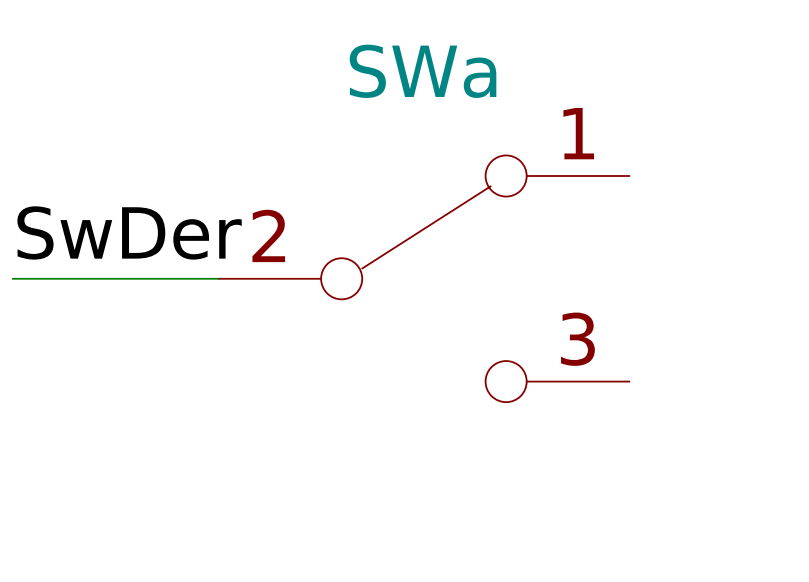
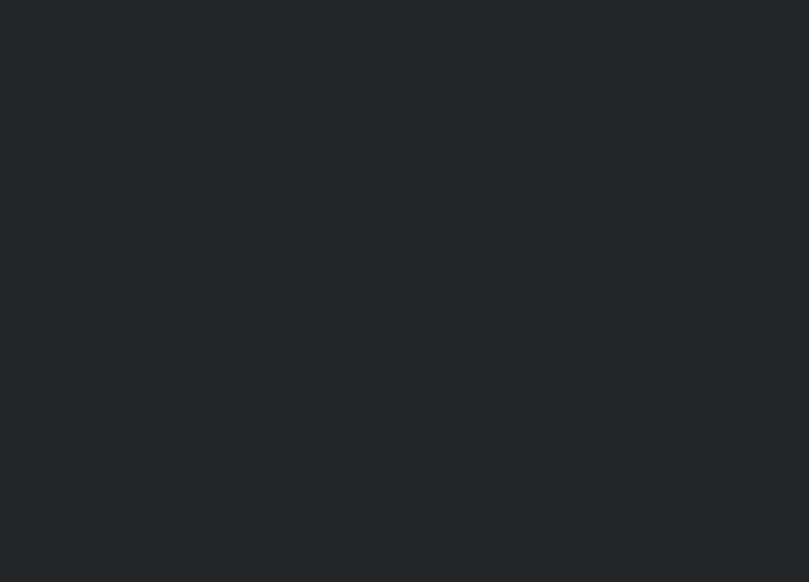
label: SwDer (129, 232) -> none
wire: (12, 278) (218, 278) -> none
SWa: (423, 278) -> none

